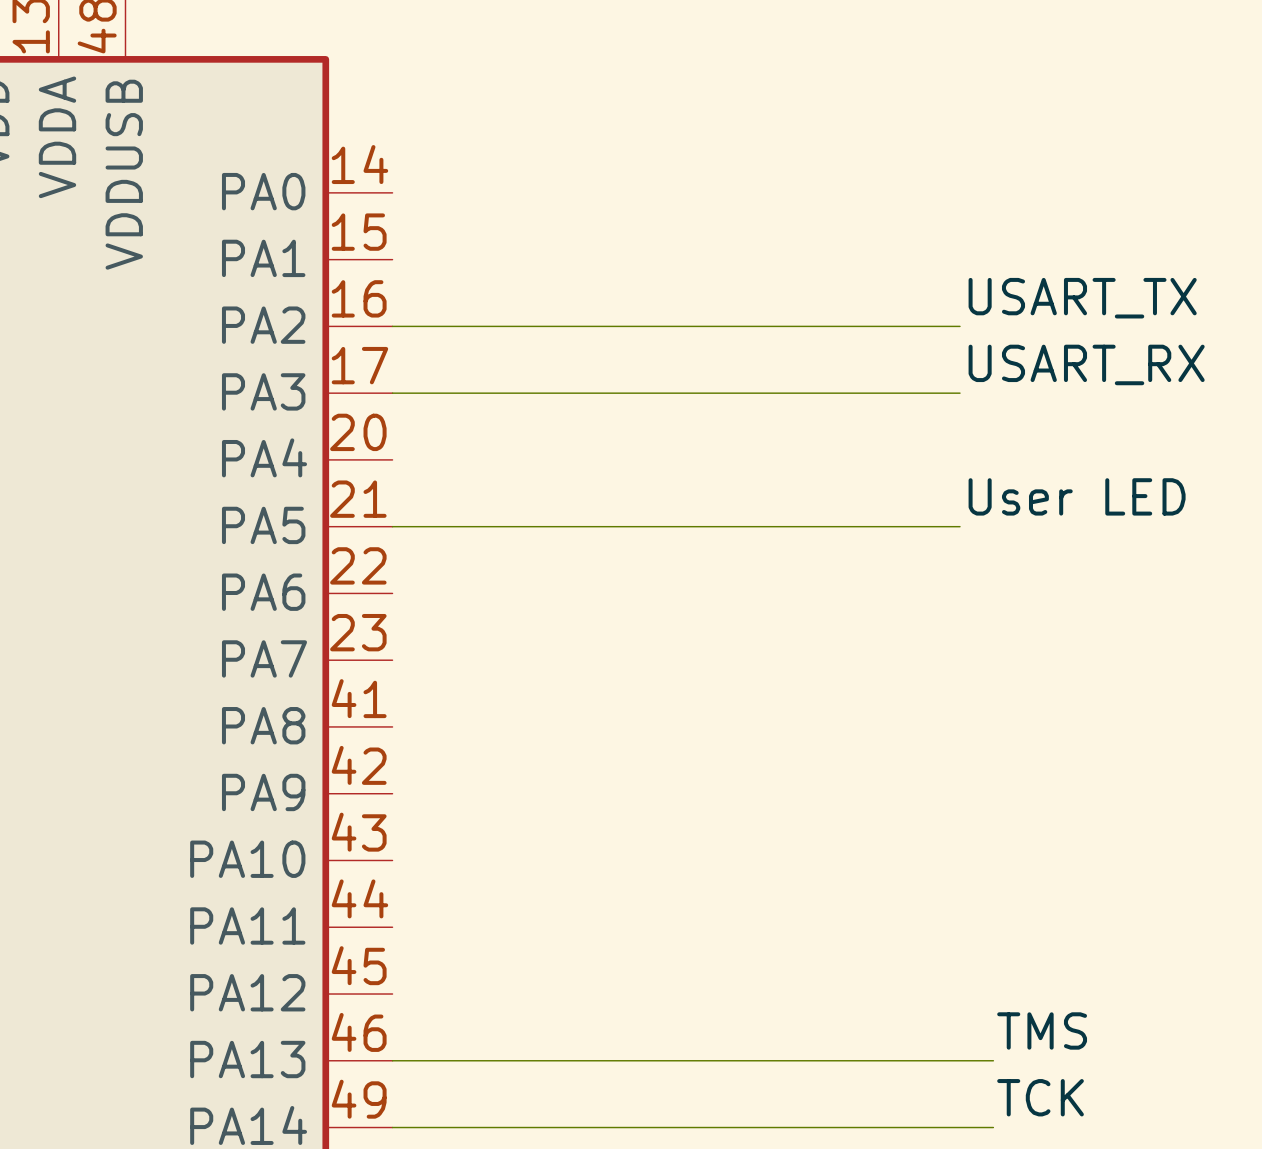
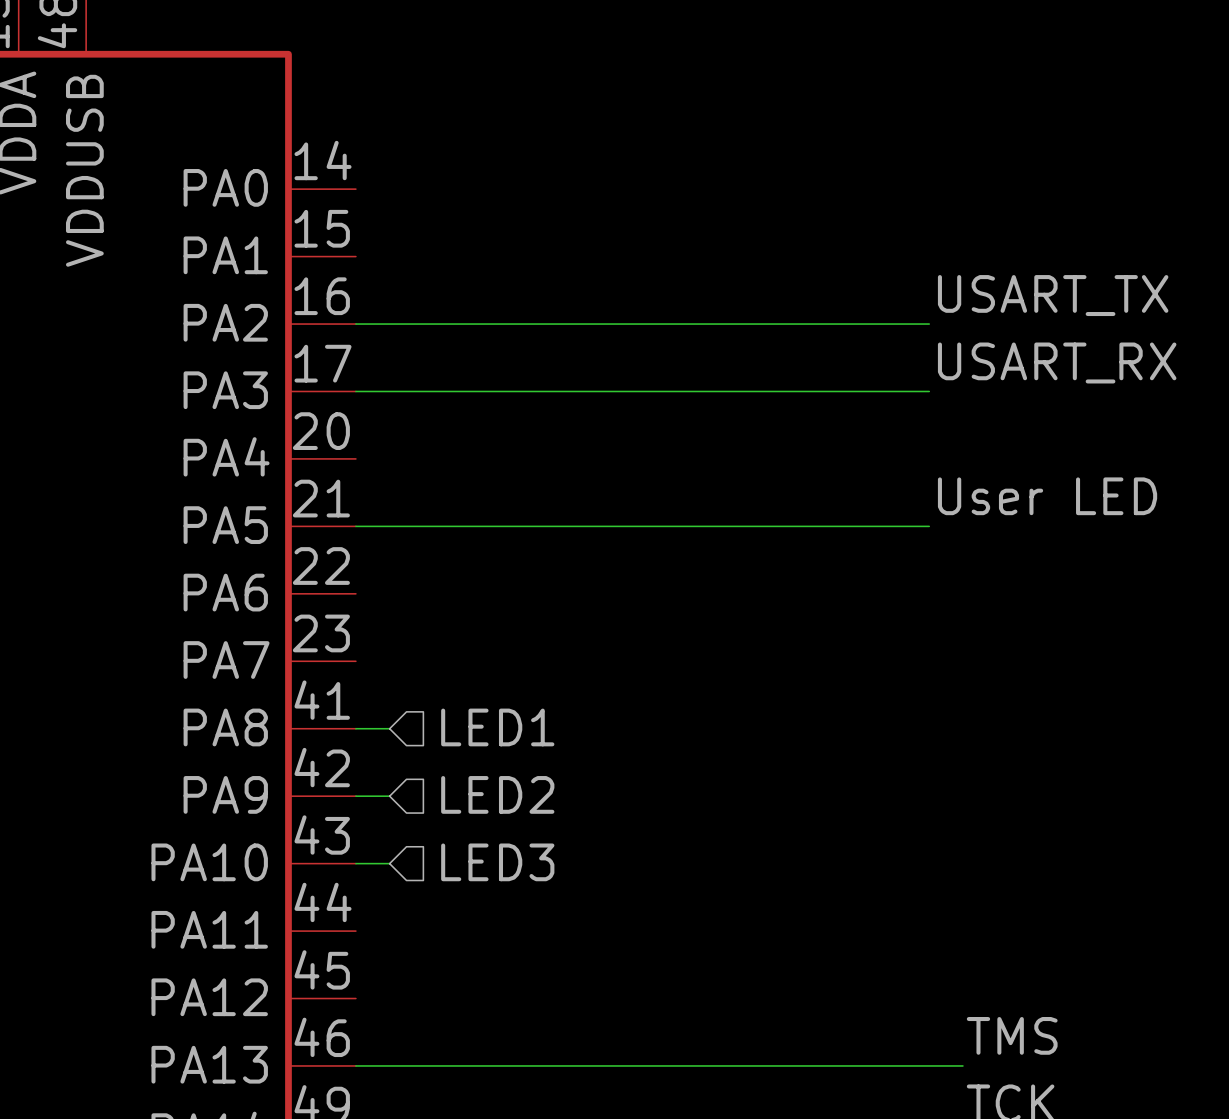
hierarchical label: none -> LED1 (497, 727)
wire: none -> (355, 728) (389, 728)
hierarchical label: none -> LED2 (497, 794)
wire: none -> (355, 796) (389, 796)
hierarchical label: none -> LED3 (497, 862)
wire: none -> (355, 863) (389, 863)

